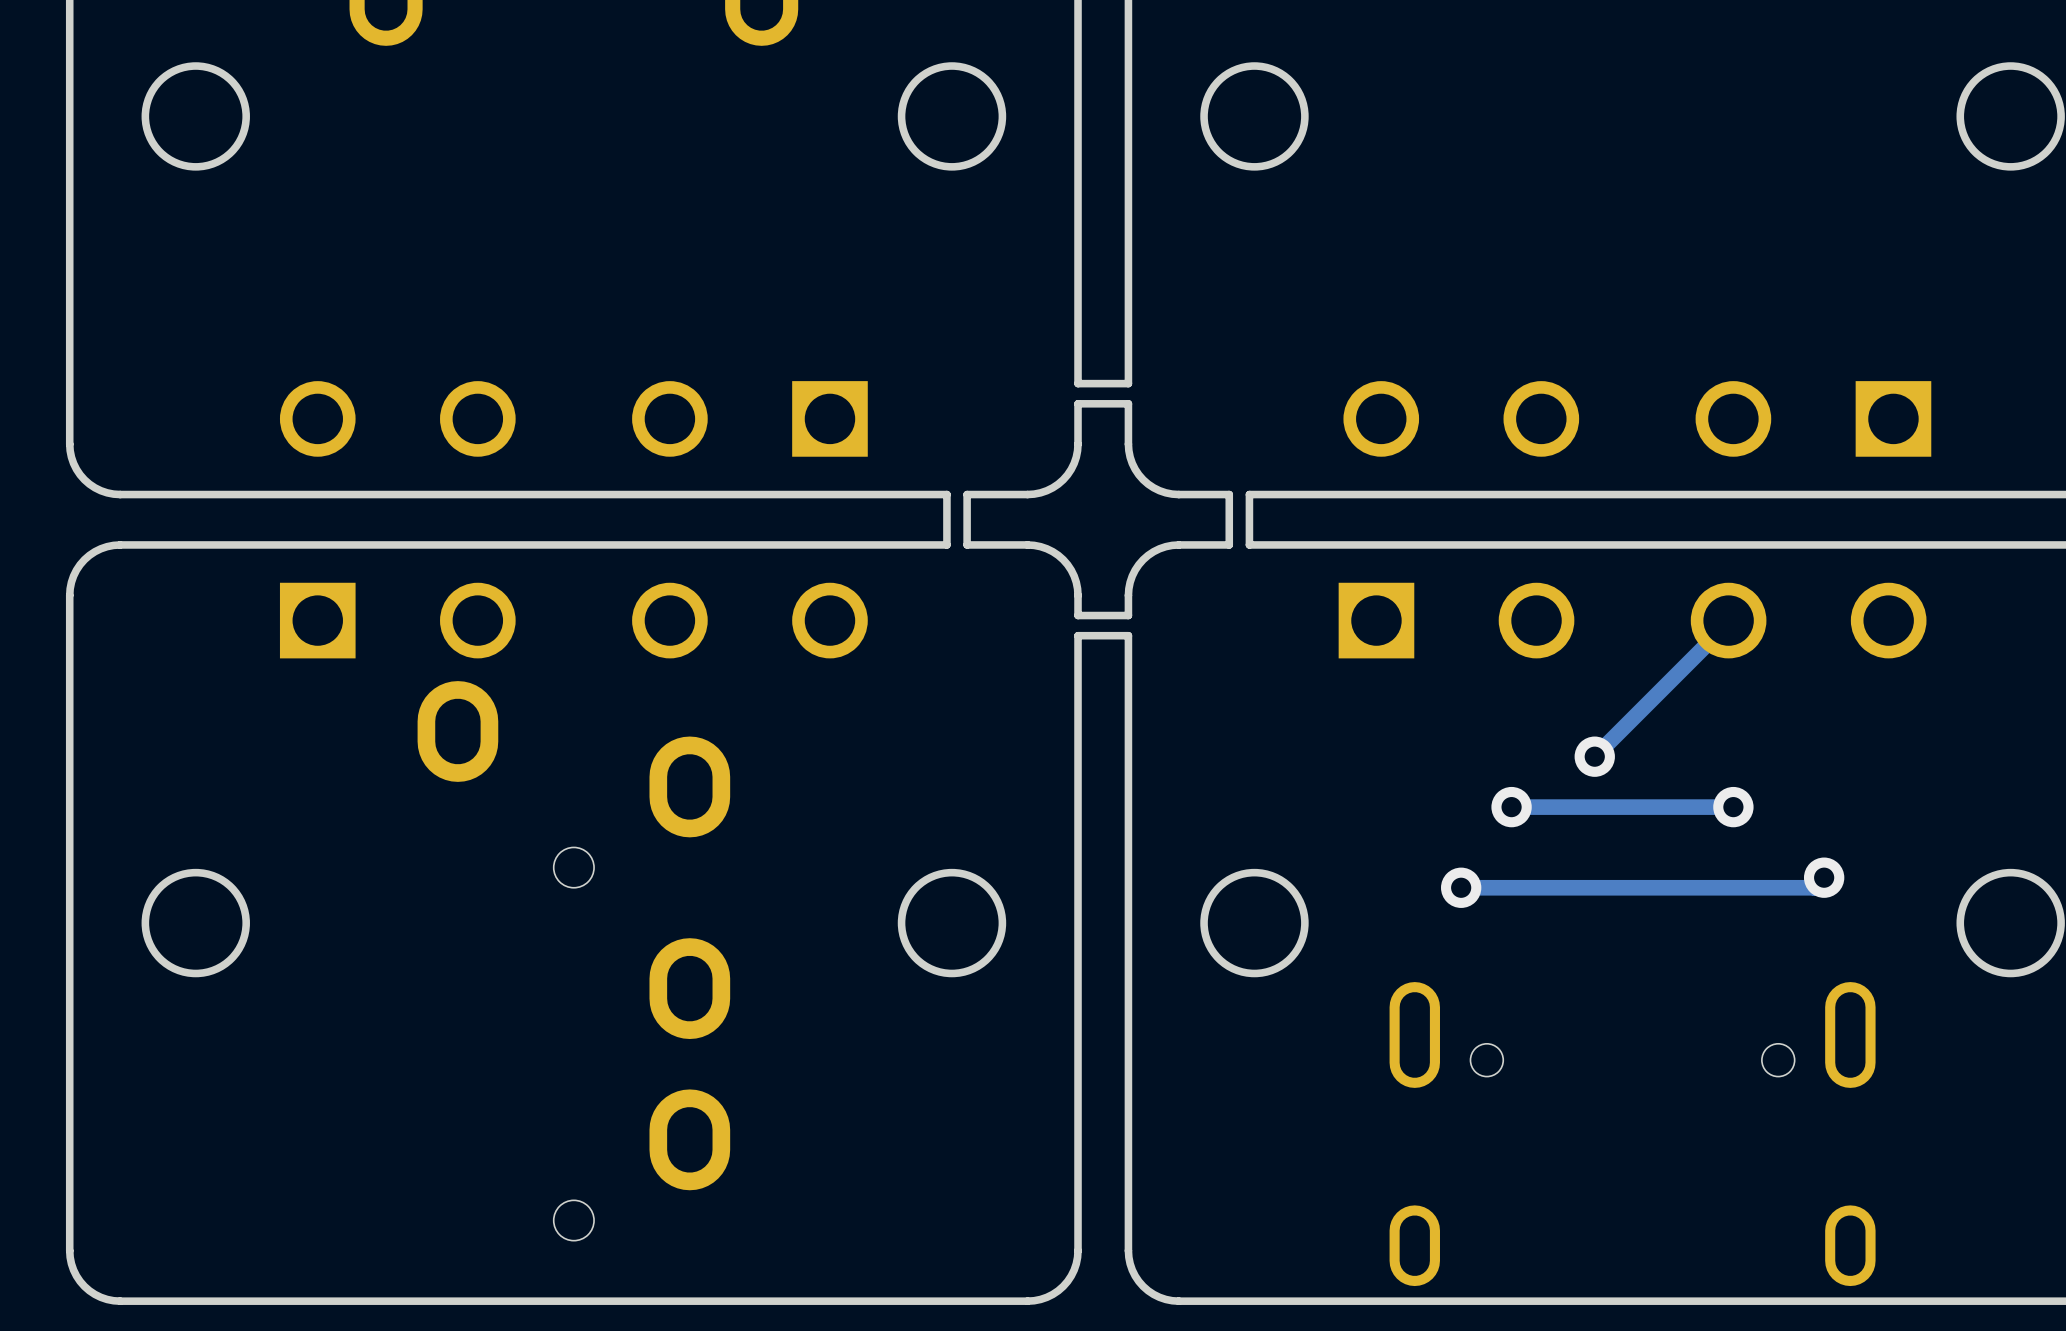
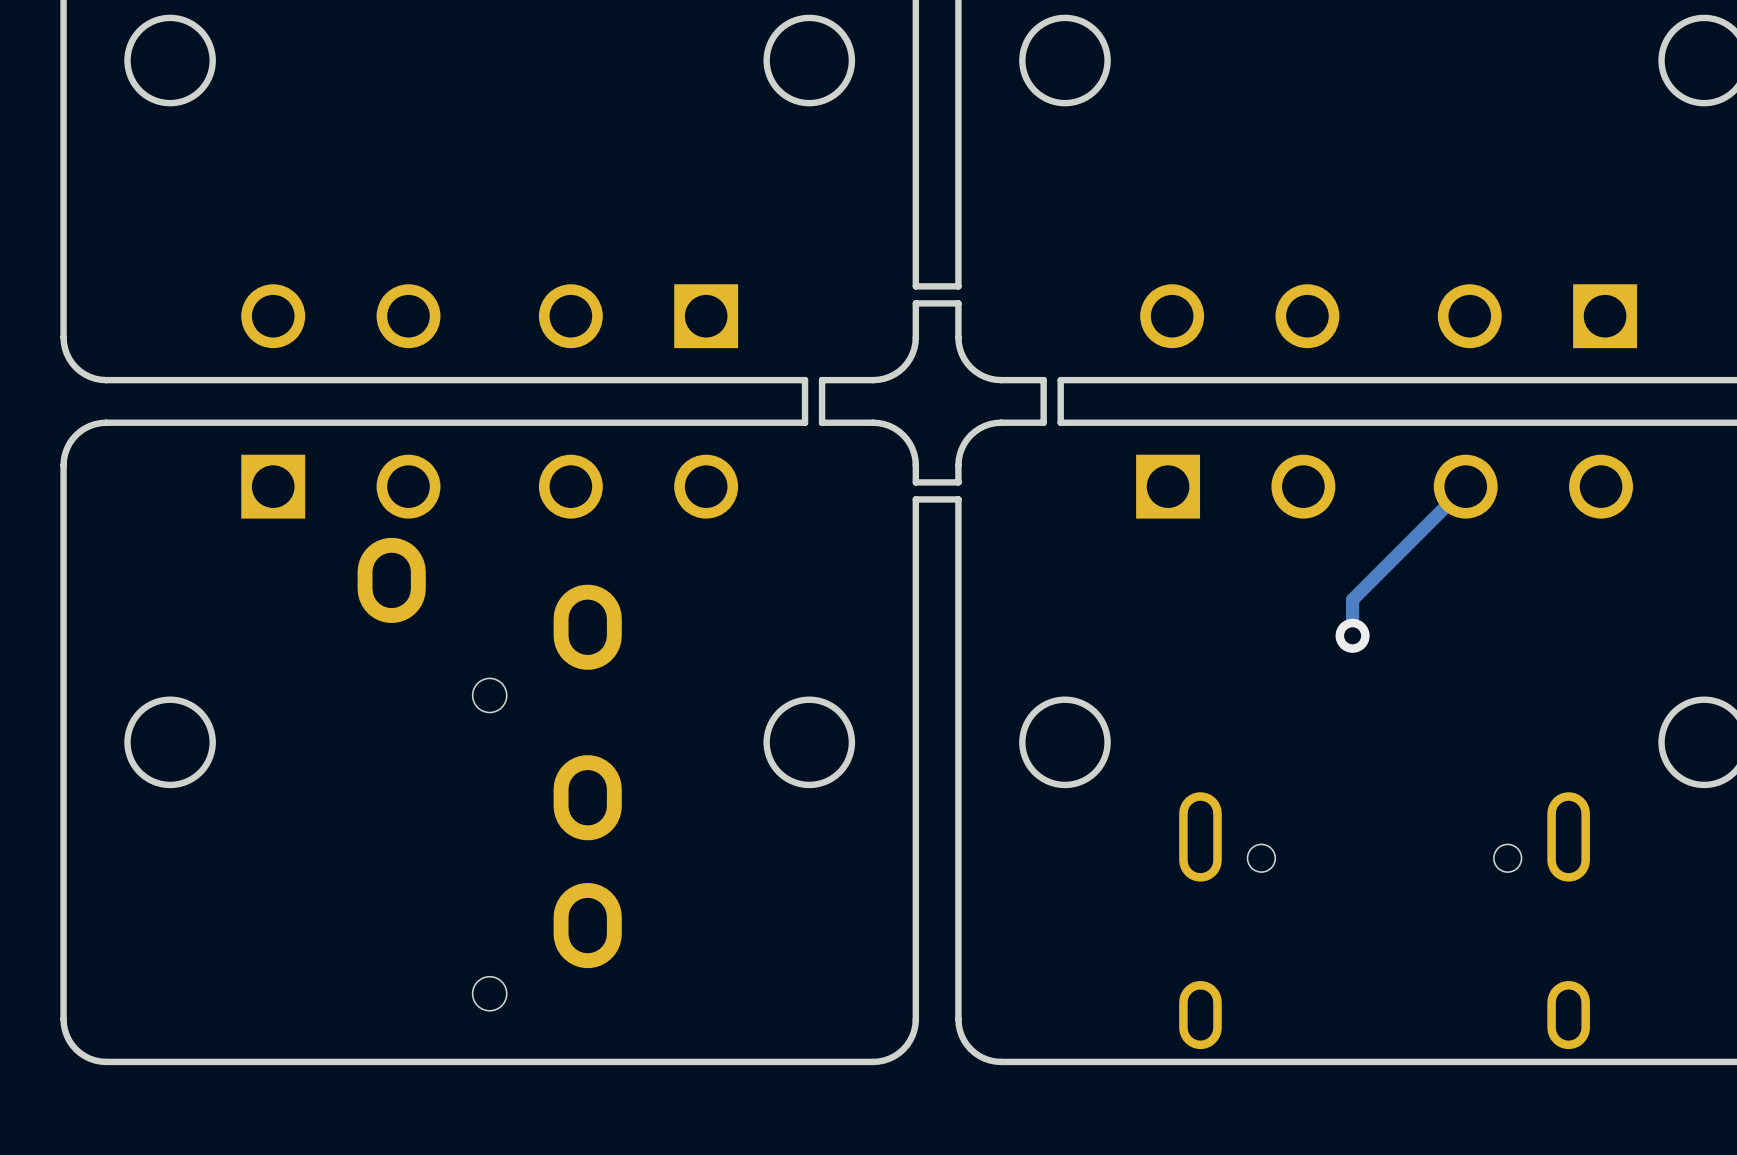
track: (1728, 620) (1728, 622) (1594, 756) -> (1465, 486) (1352, 599) (1352, 635)
via position: (1594, 756) -> (1352, 635)
via: (1511, 807) -> none
track: (1733, 807) (1511, 807) -> none
via: (1733, 807) -> none
track: (1824, 877) (1814, 887) (1461, 887) -> none
via: (1824, 877) -> none
via: (1461, 887) -> none

